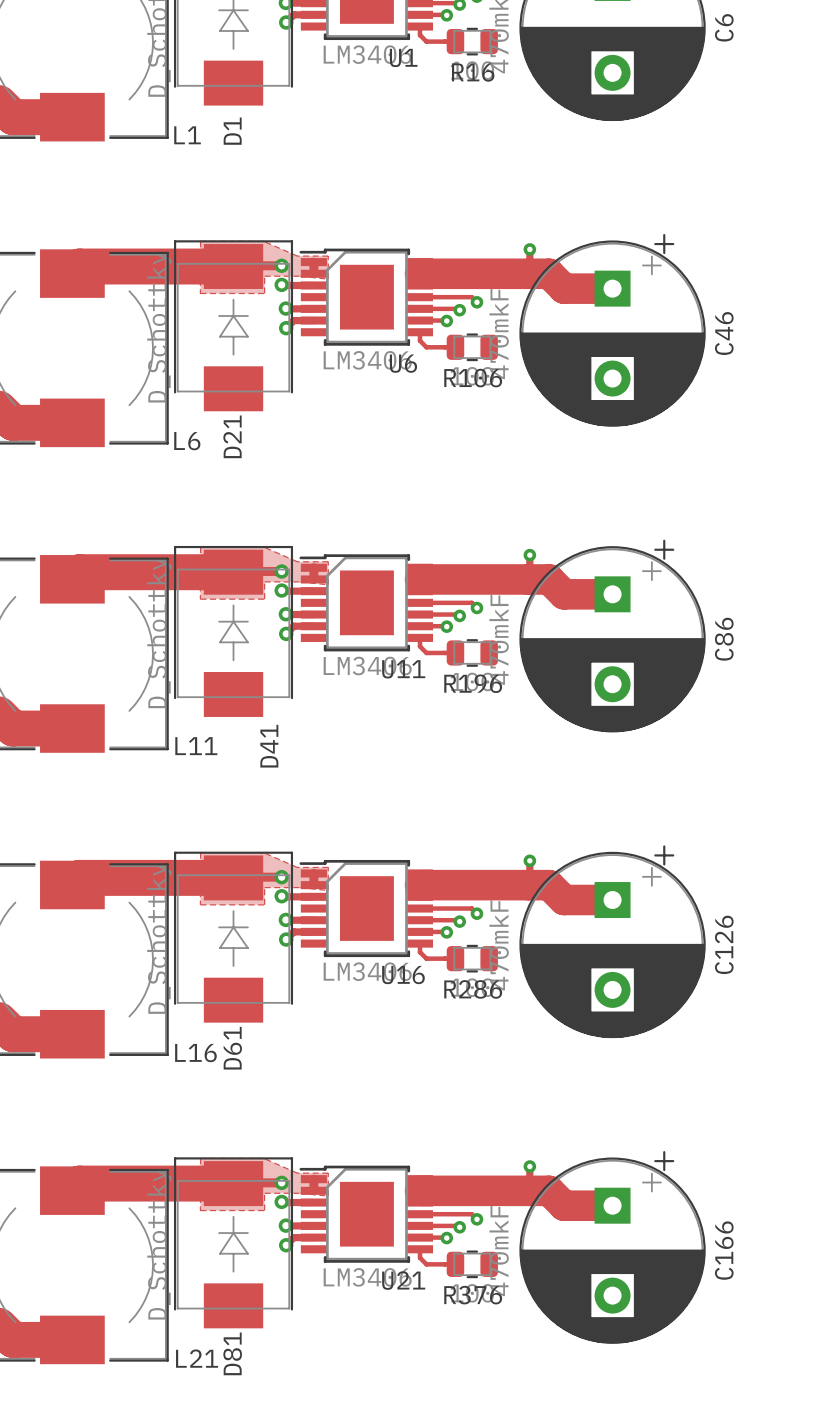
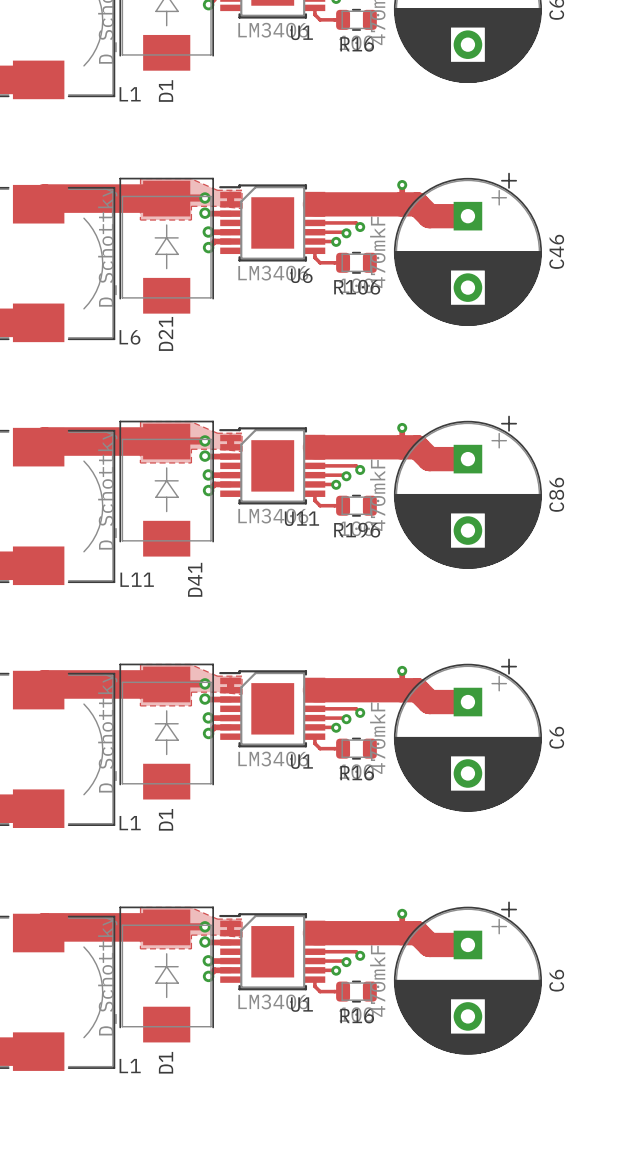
C126 name: C126 (724, 944) -> C6 (556, 737)
U16 name: U16 (403, 975) -> U1 (301, 761)
R286 name: R286 (473, 989) -> R16 (357, 773)
D61 name: D61 (232, 1048) -> D1 (166, 819)
L16 name: L16 (195, 1053) -> L1 (130, 823)
C166 name: C166 (724, 1250) -> C6 (556, 980)
U21 name: U21 (403, 1280) -> U1 (301, 1004)
R376 name: R376 (473, 1295) -> R16 (357, 1016)
D81 name: D81 (232, 1353) -> D1 (166, 1062)
L21 name: L21 (197, 1358) -> L1 (130, 1066)

